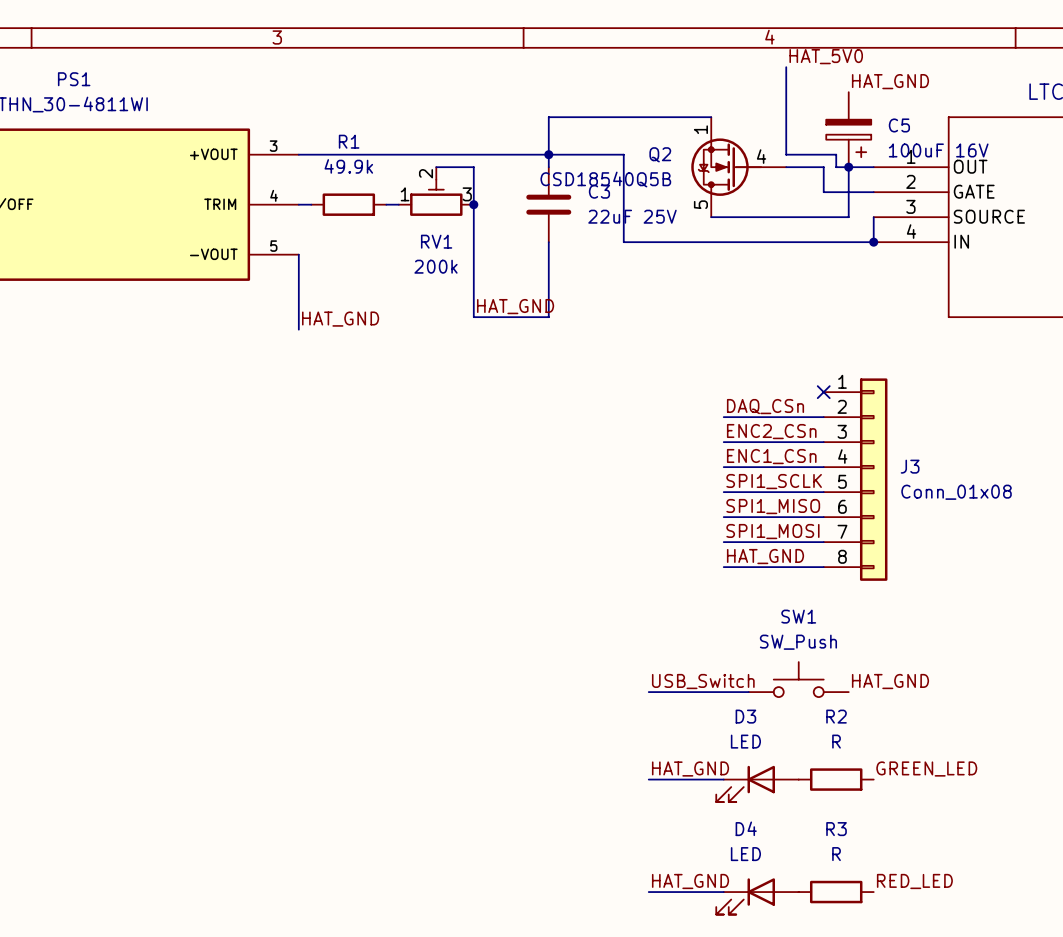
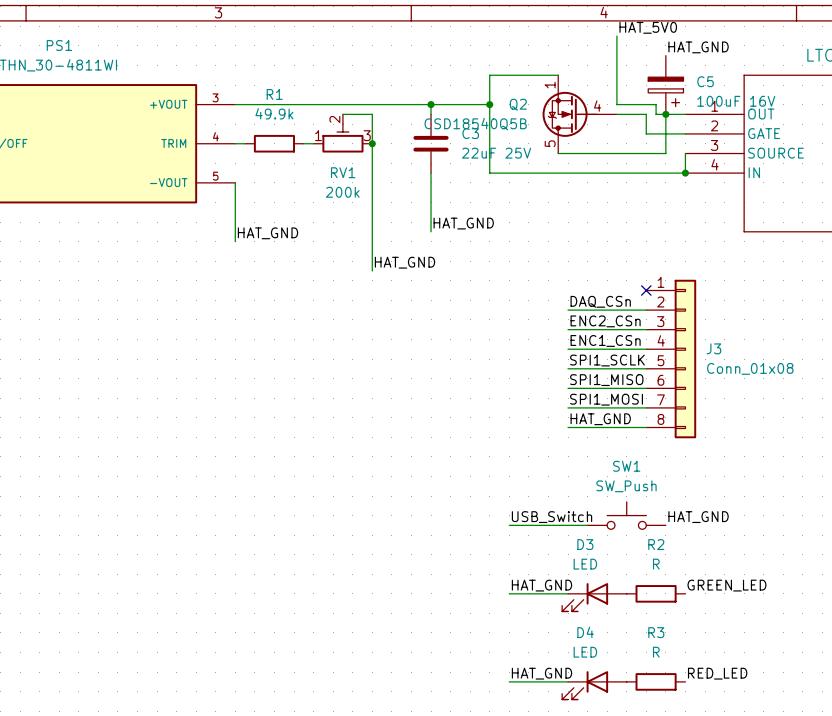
wire: (623, 117) (548, 117) (548, 154) -> (489, 75) (489, 104)
junction: none -> (489, 104)
label position: HAT_GND (515, 306) -> HAT_GND (463, 223)
wire: (473, 317) (548, 317) -> (372, 231) (372, 270)
label: none -> HAT_GND (404, 262)

